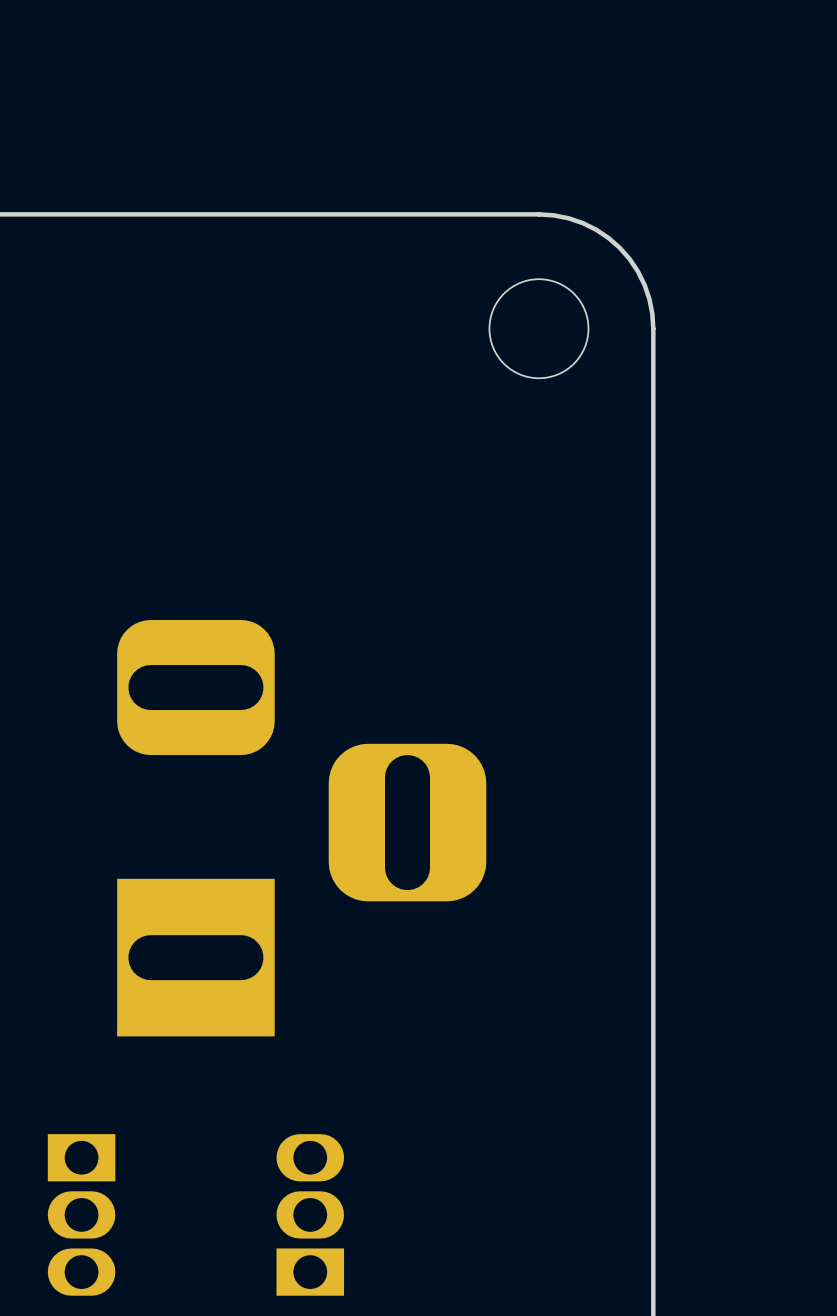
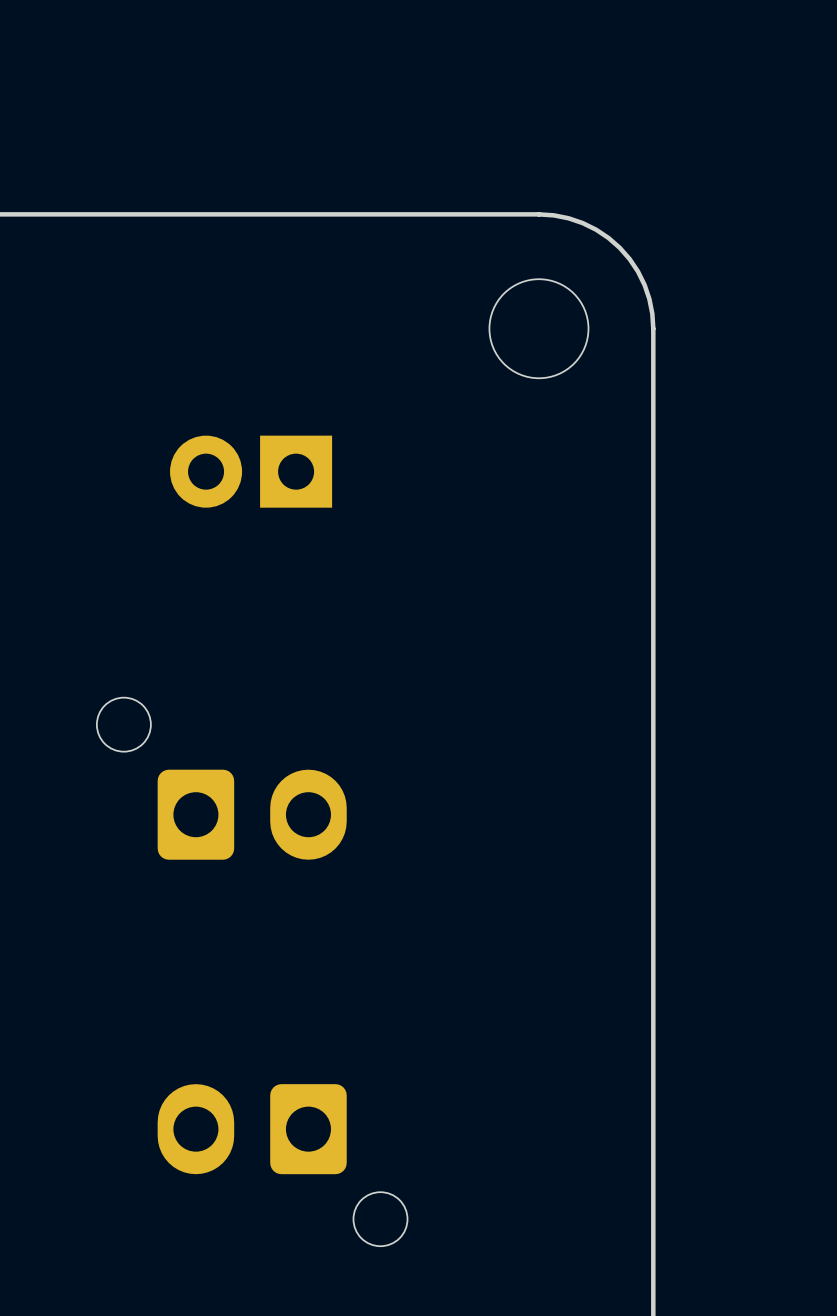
part: none -> (251, 471)
part: none -> (221, 778)
part: (301, 828) -> none
part: none -> (282, 1165)
part: (81, 1214) -> none
part: (310, 1214) -> none

